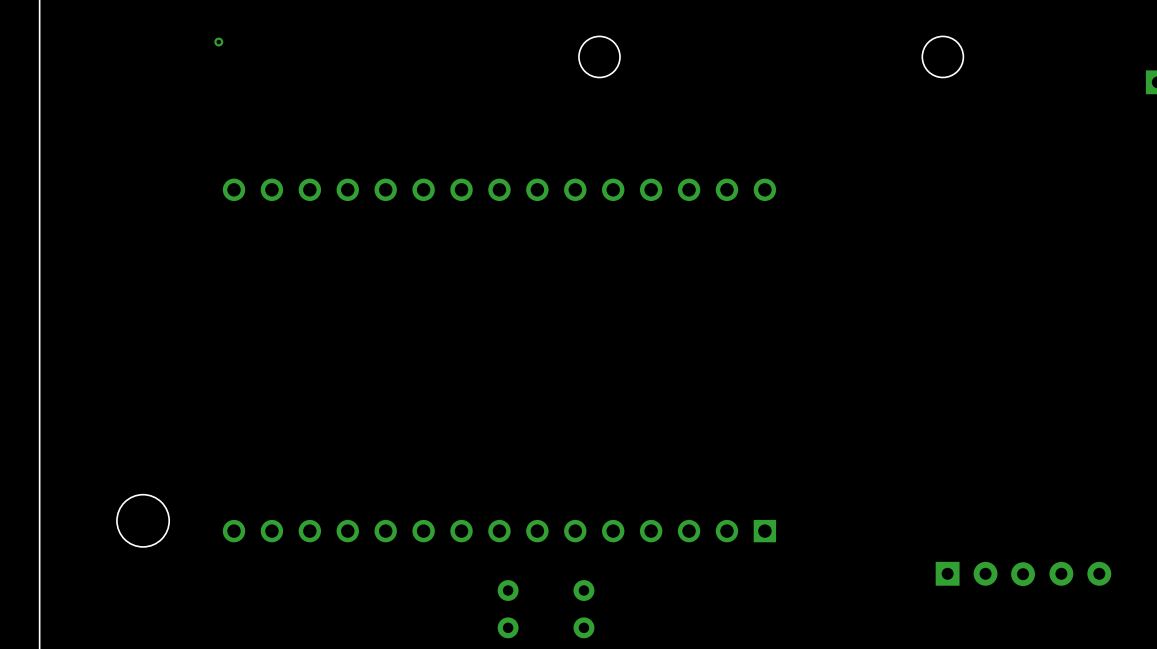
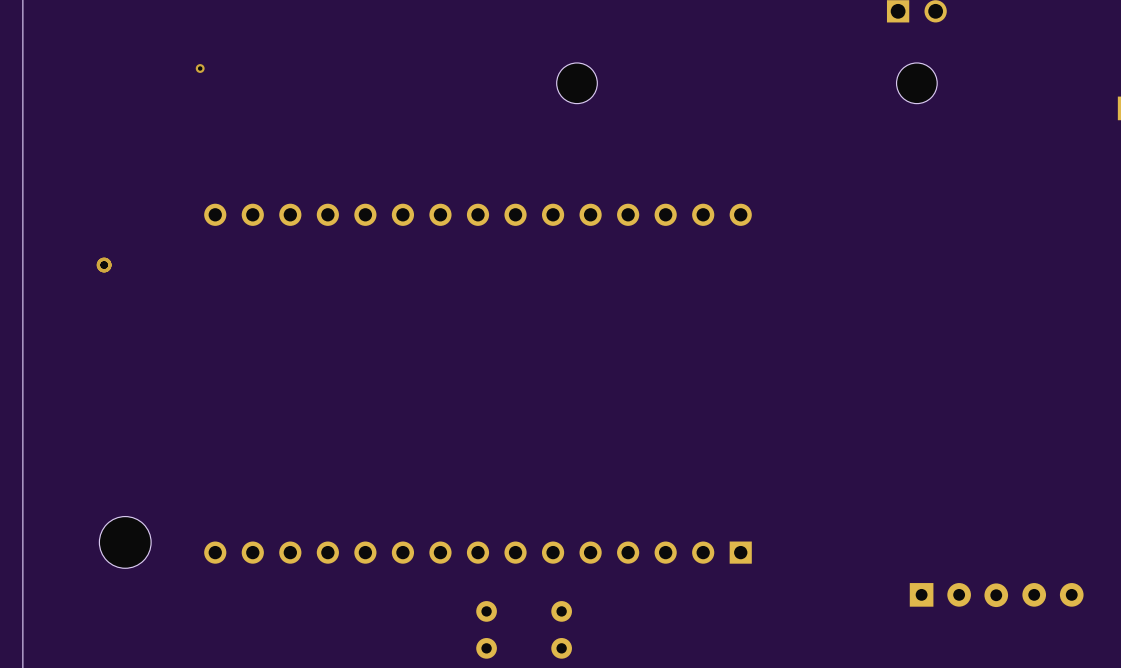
via: none -> (104, 265)

